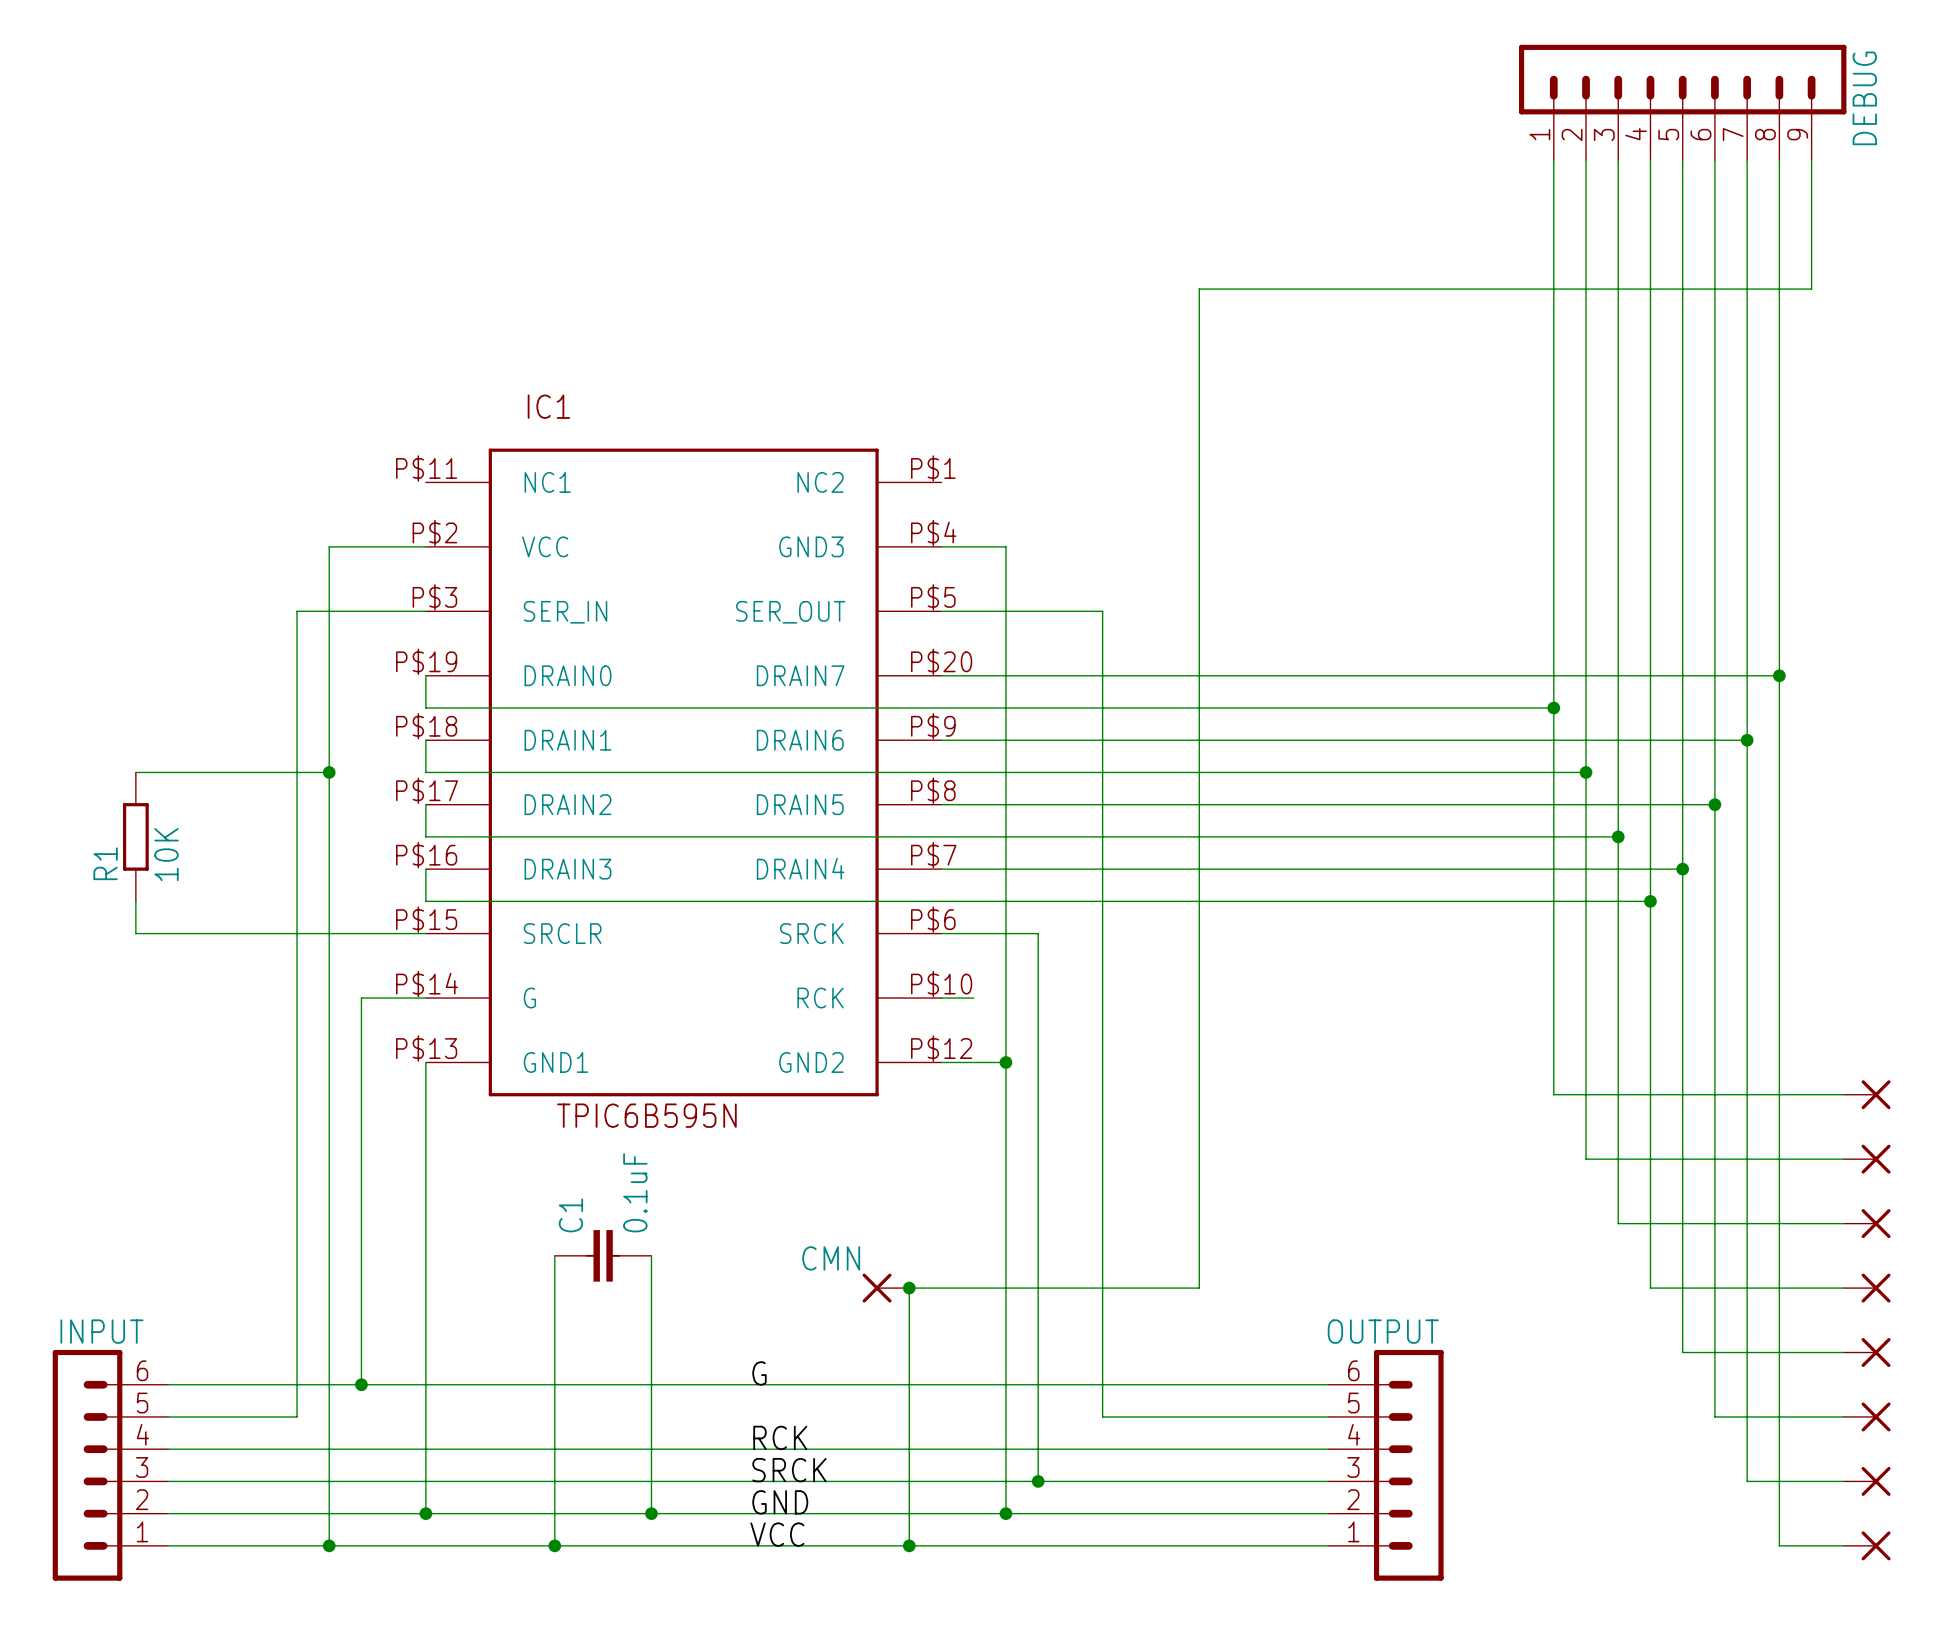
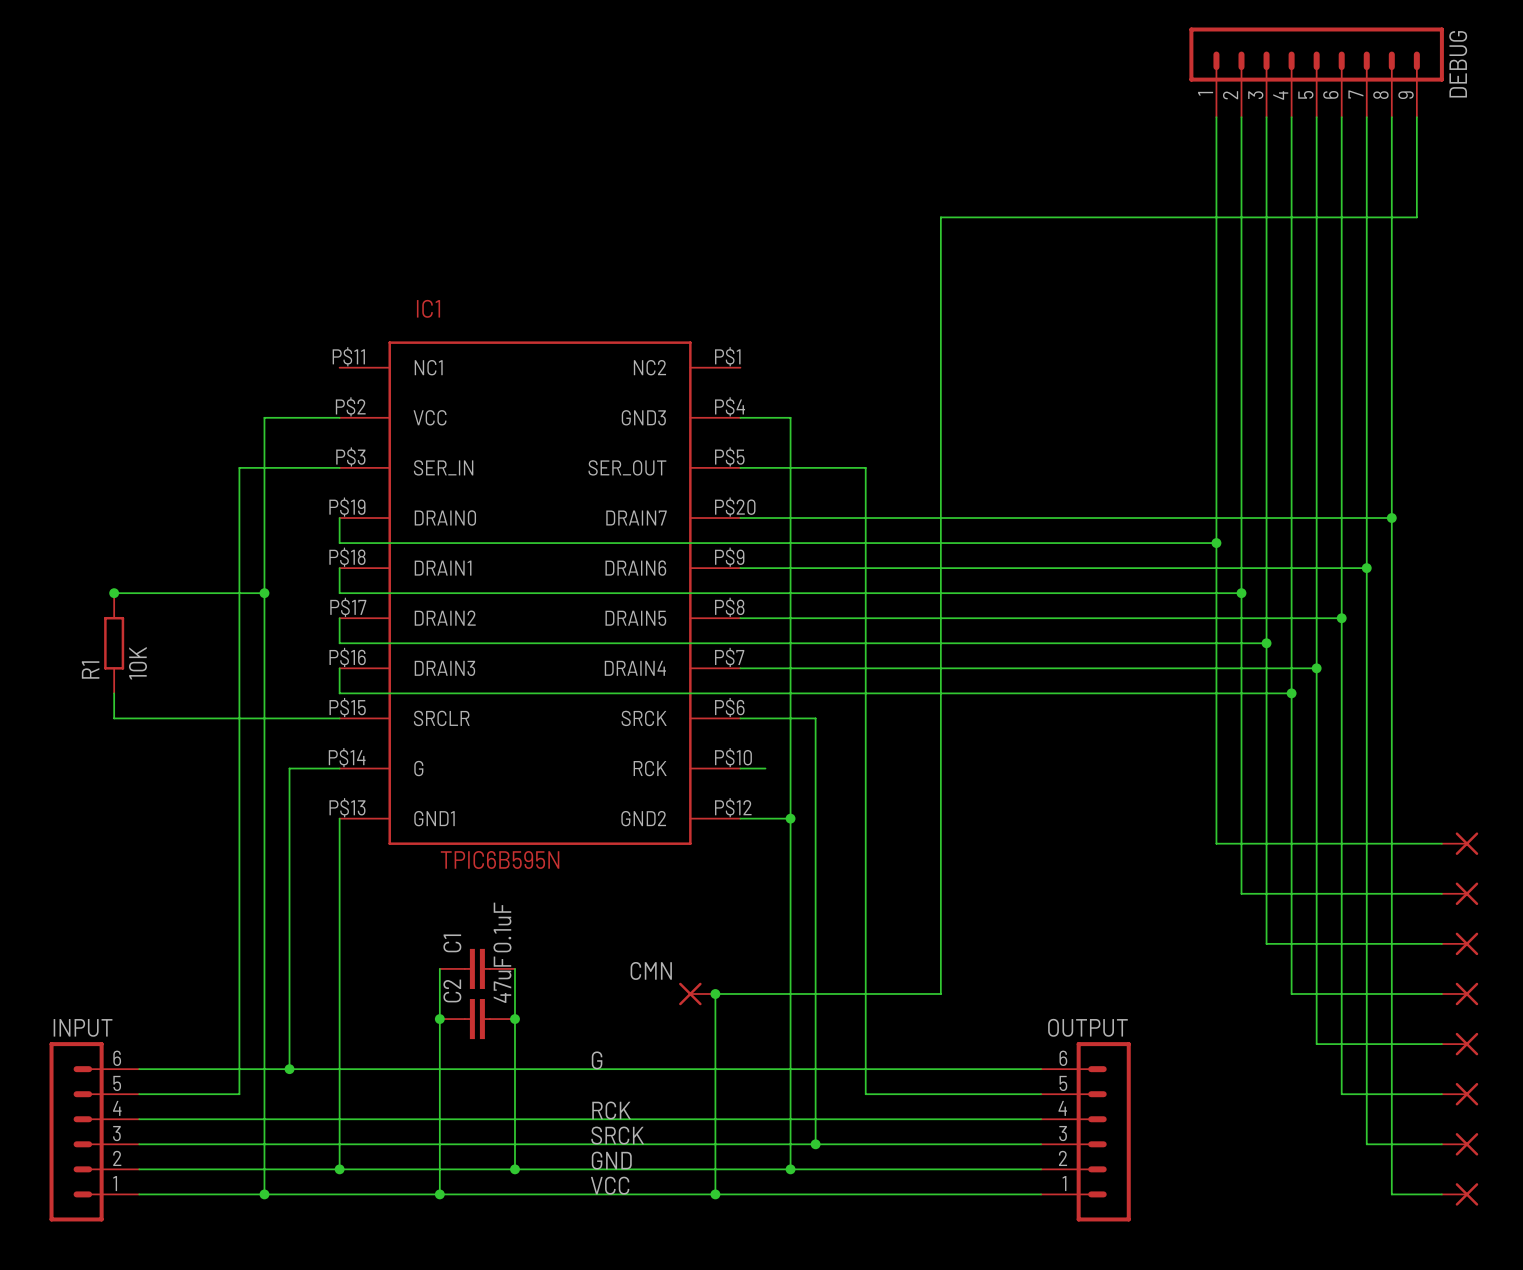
junction: none -> (114, 593)
junction: none -> (439, 1019)
C2: none -> 47uF (477, 1019)
junction: none -> (514, 1019)

